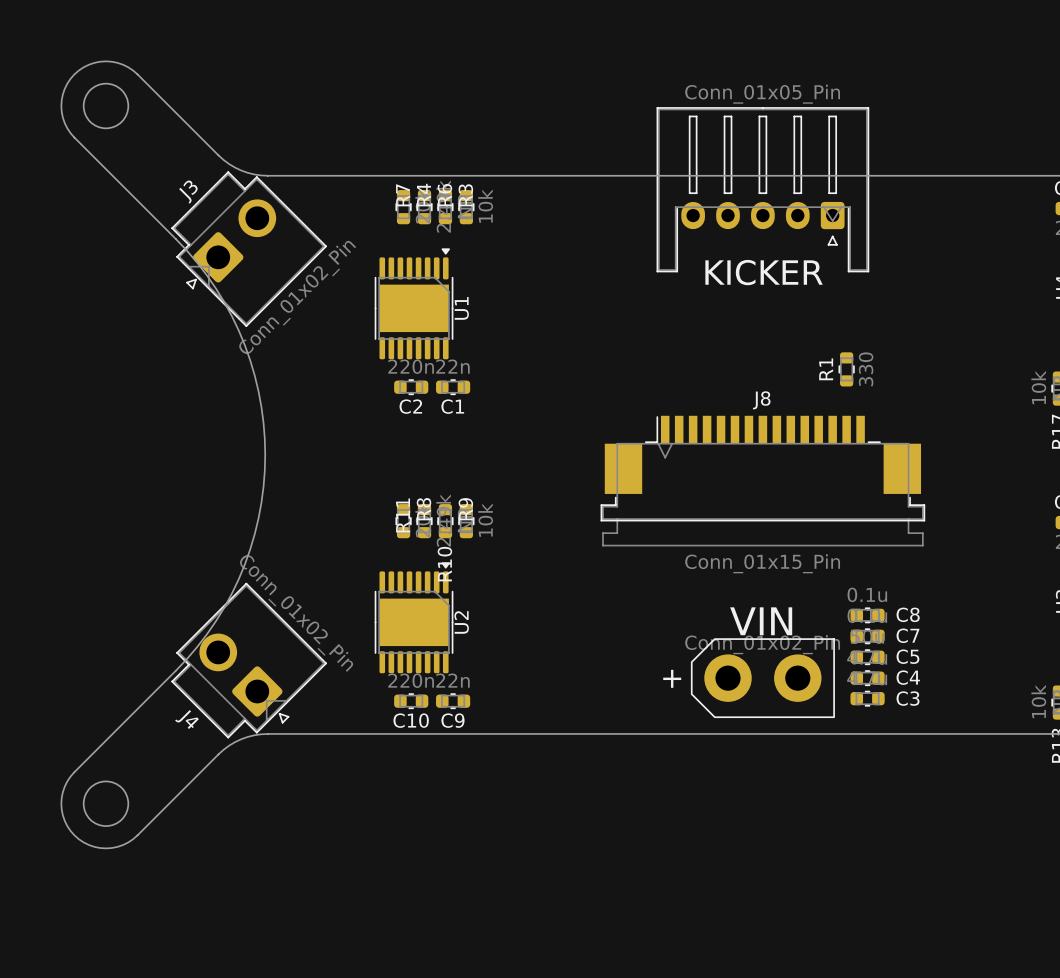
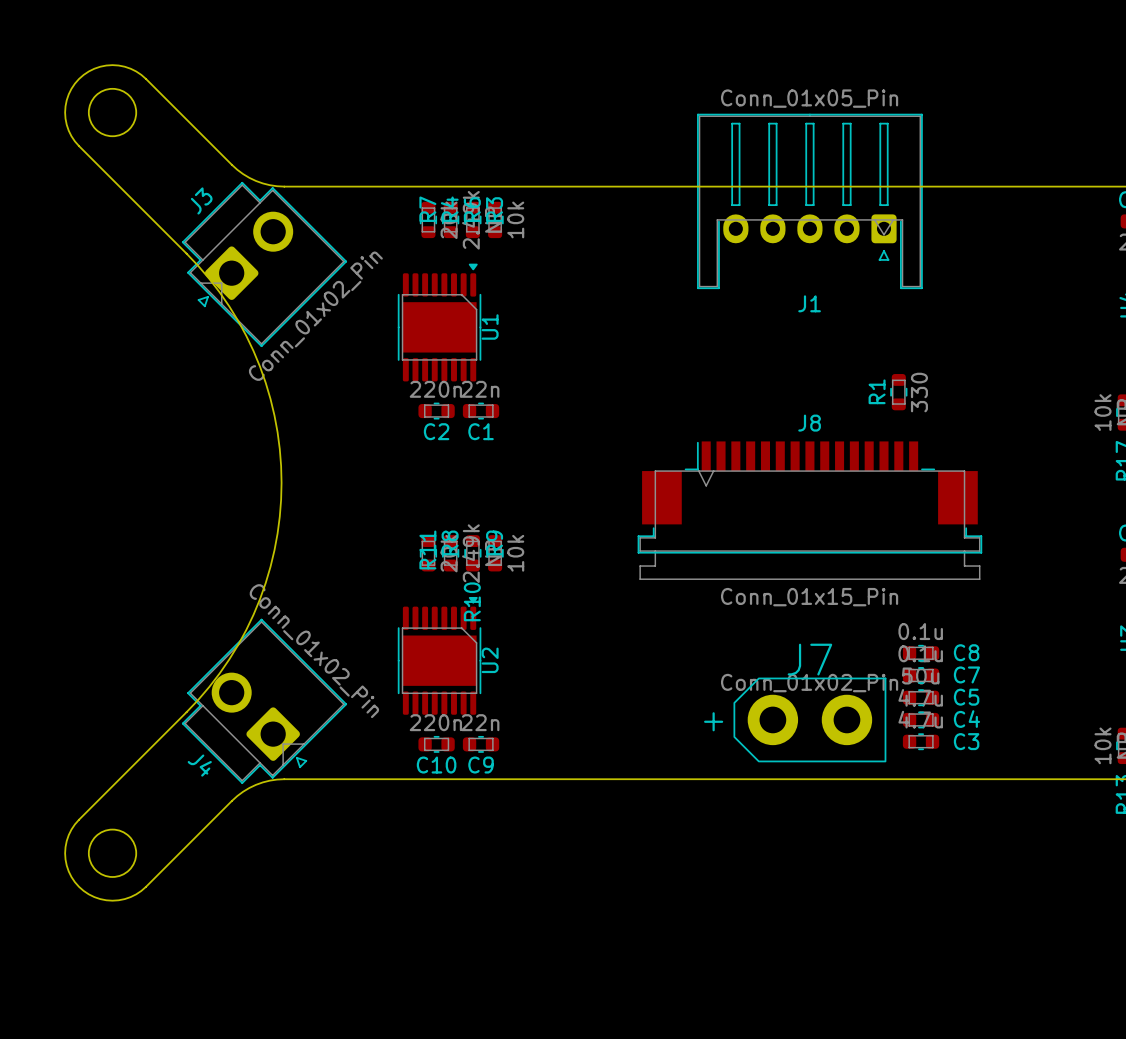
KICKER name: KICKER (764, 272) -> J1 (809, 303)
VIN name: VIN (761, 621) -> J7 (809, 659)

